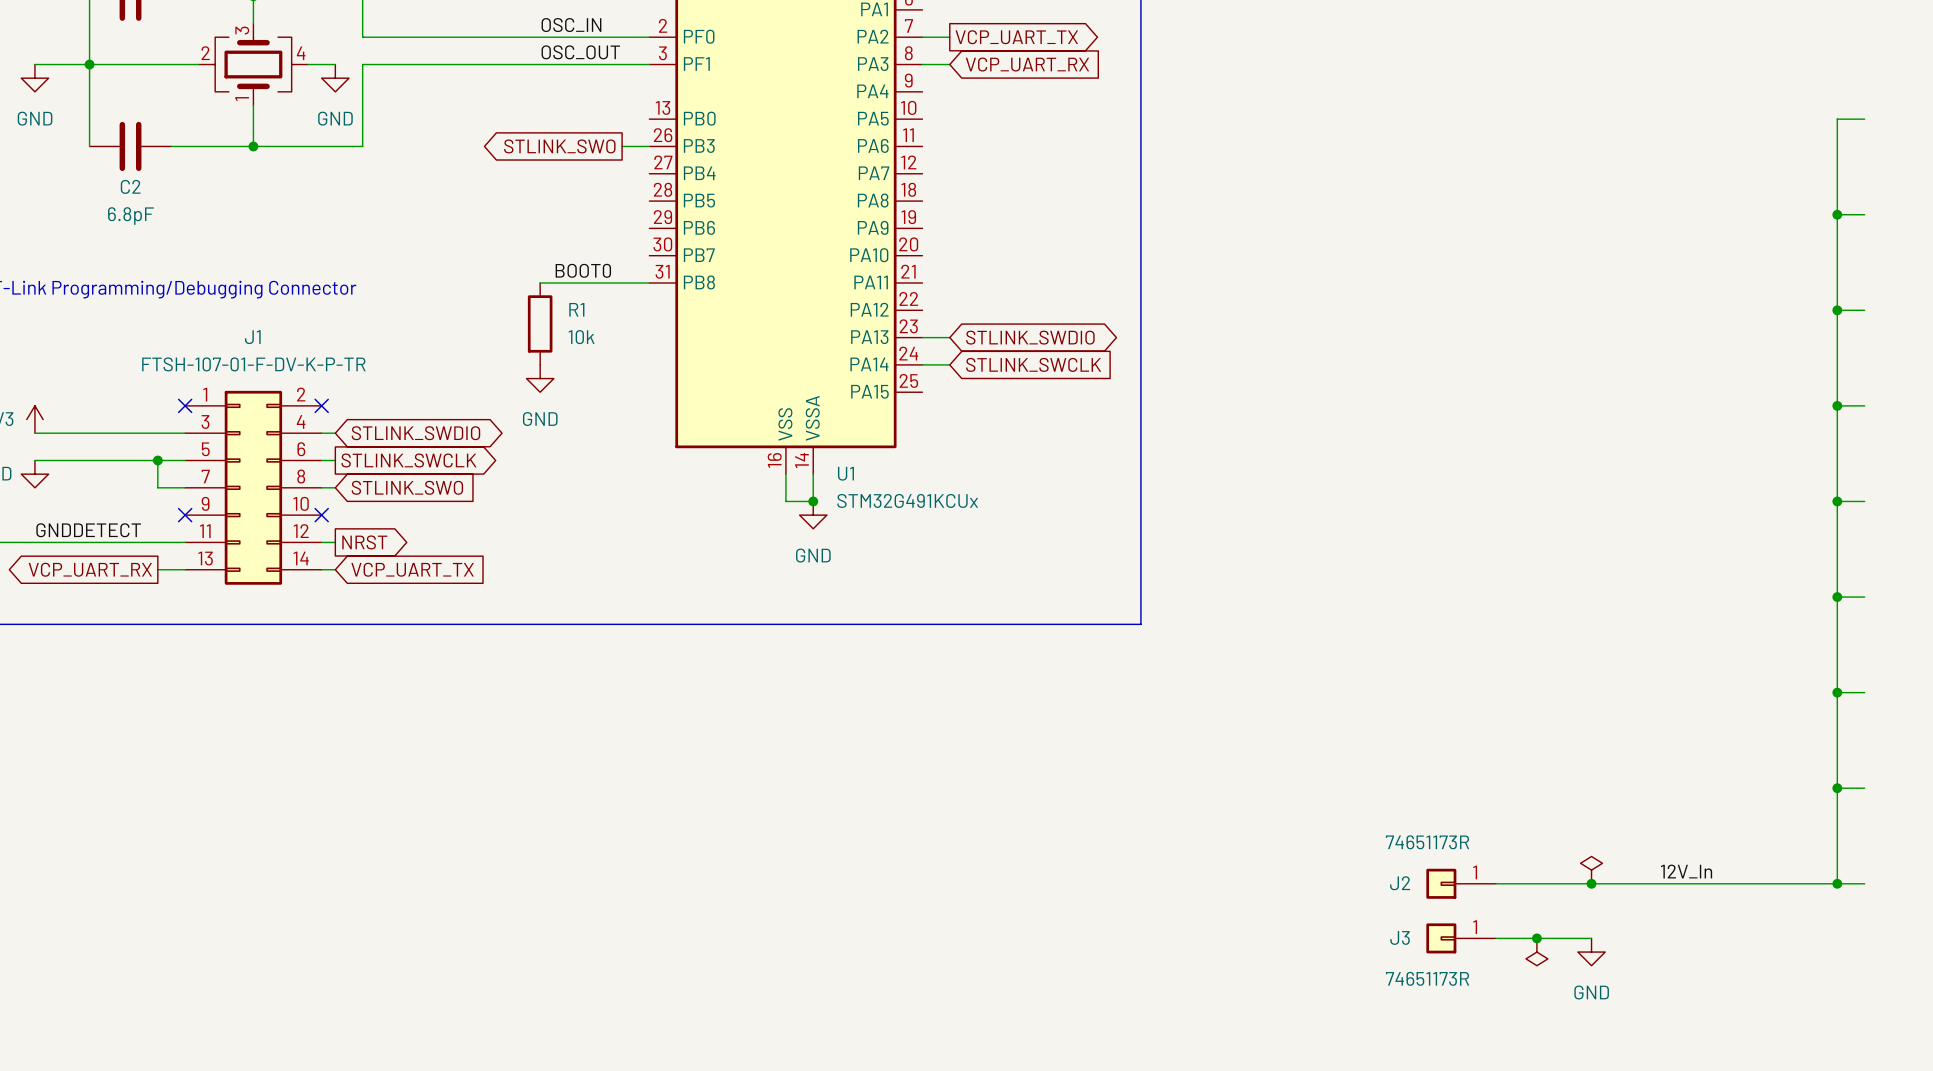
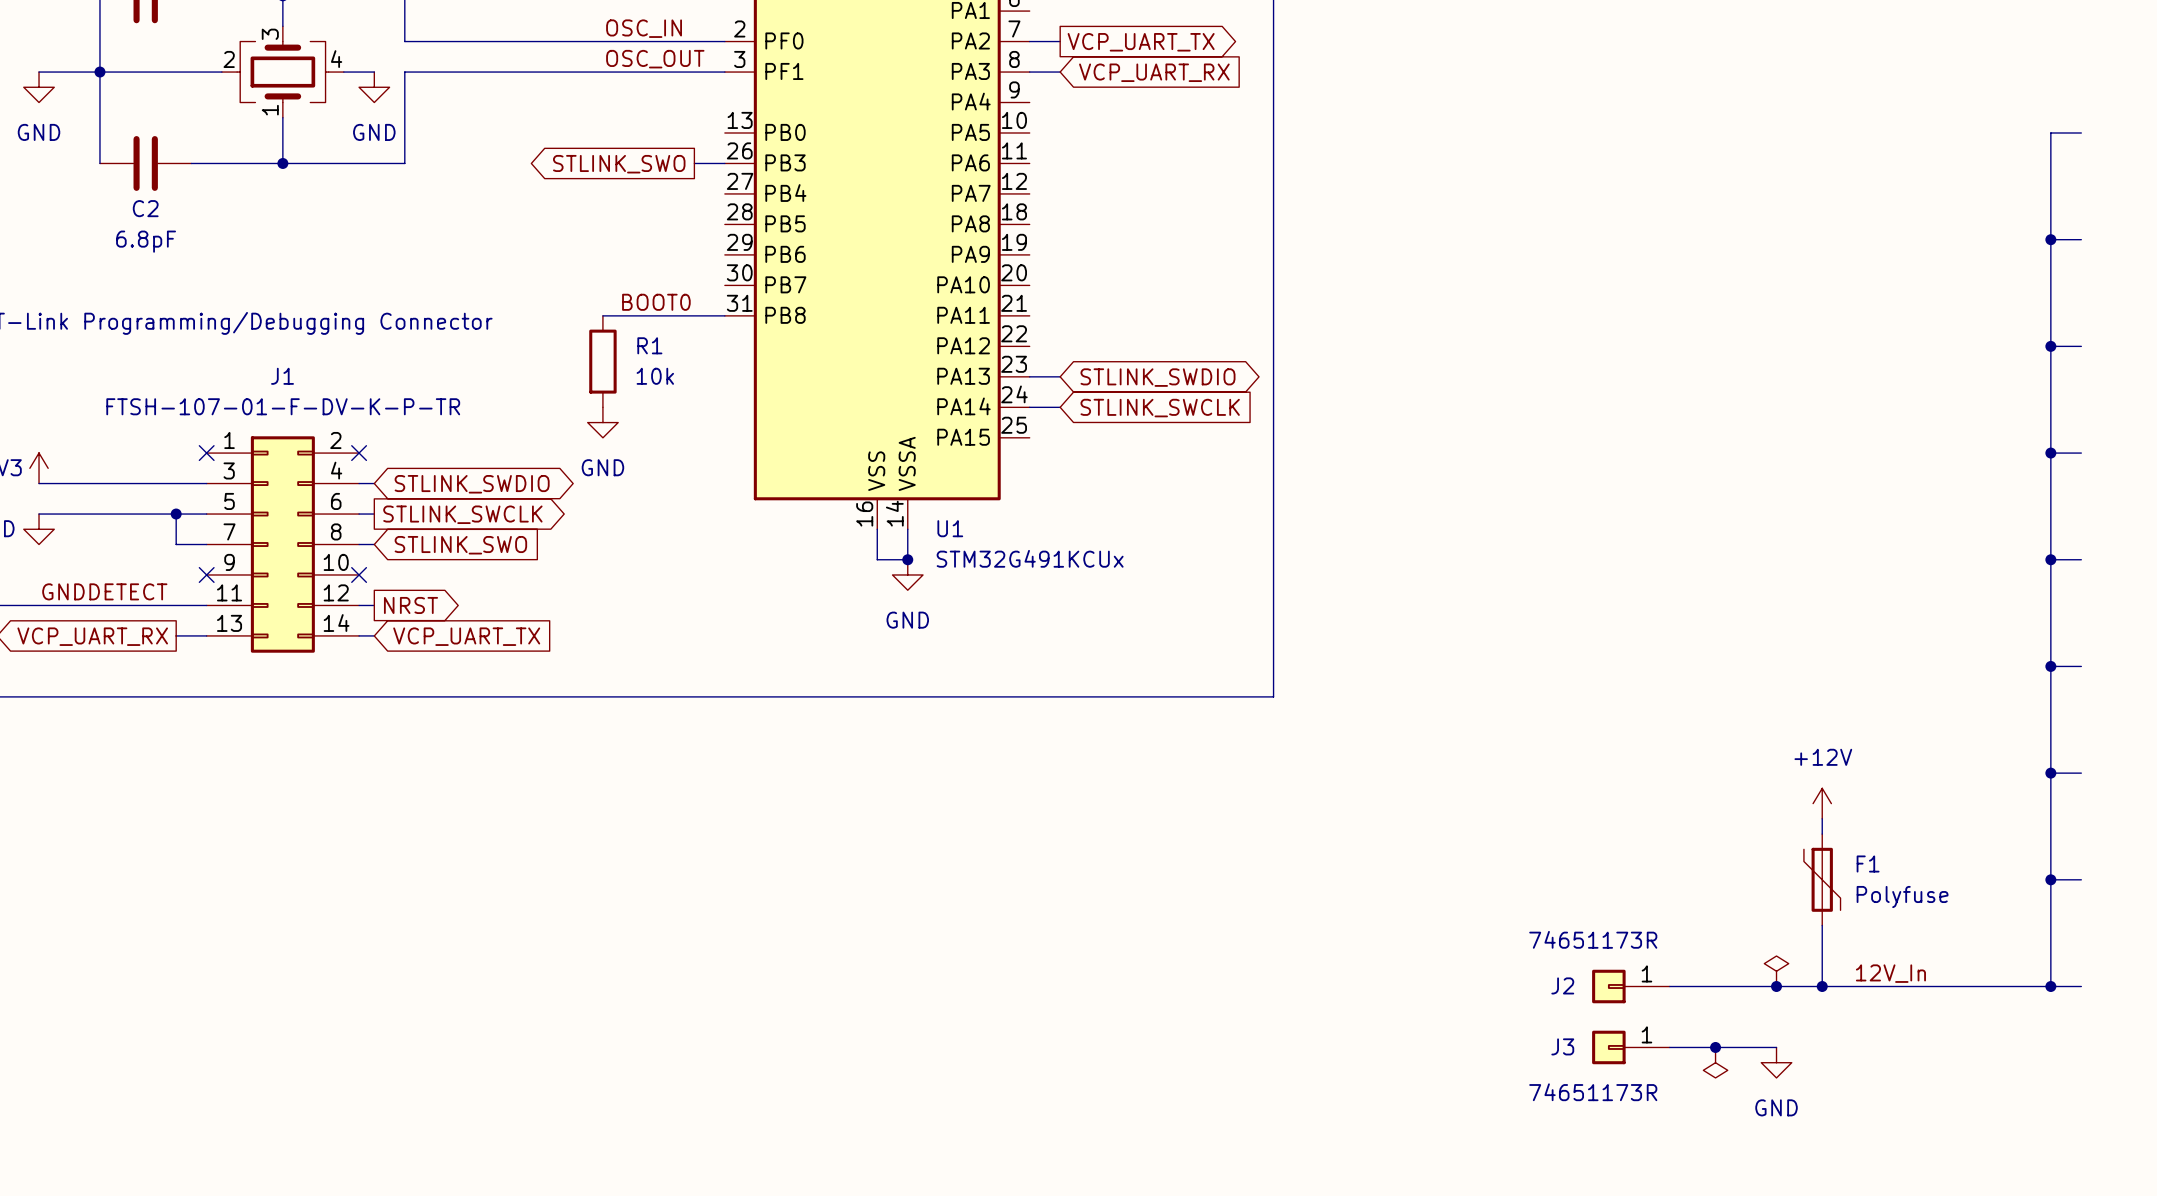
power symbol: none -> +12V (1822, 803)
wire: none -> (1822, 818) (1822, 834)
F1: none -> Polyfuse (1822, 879)
wire: none -> (1822, 925) (1822, 986)
junction: none -> (1822, 986)

